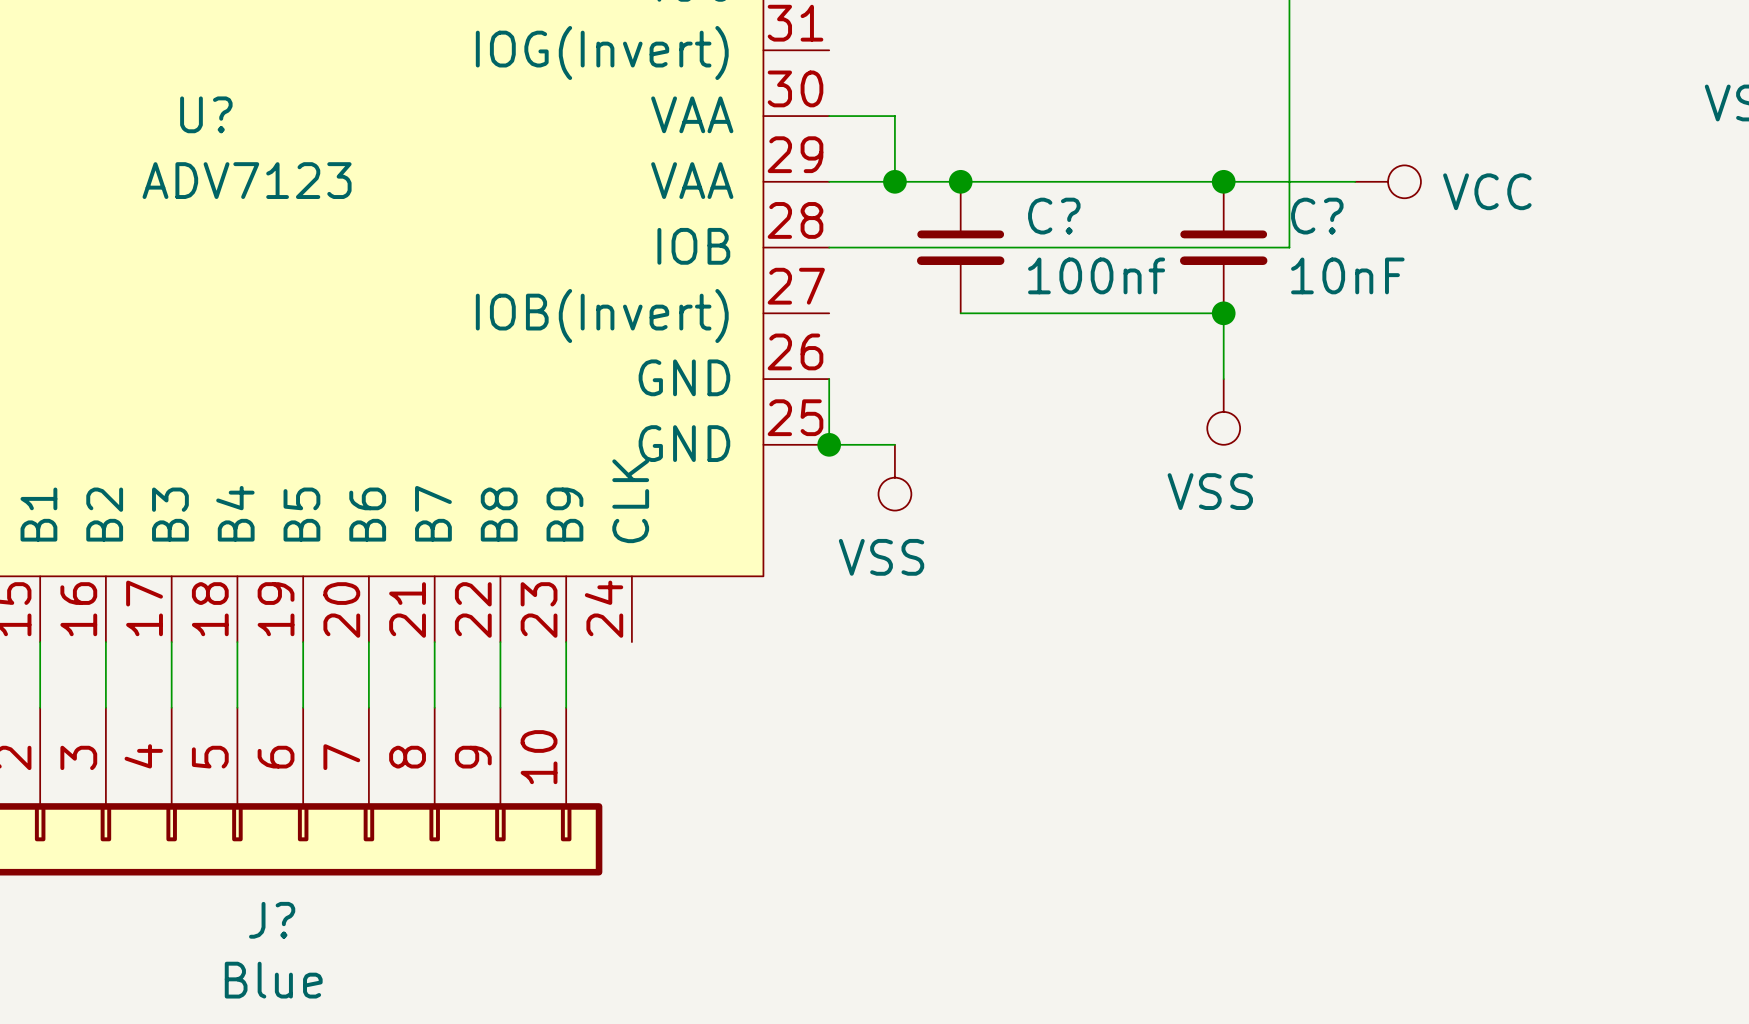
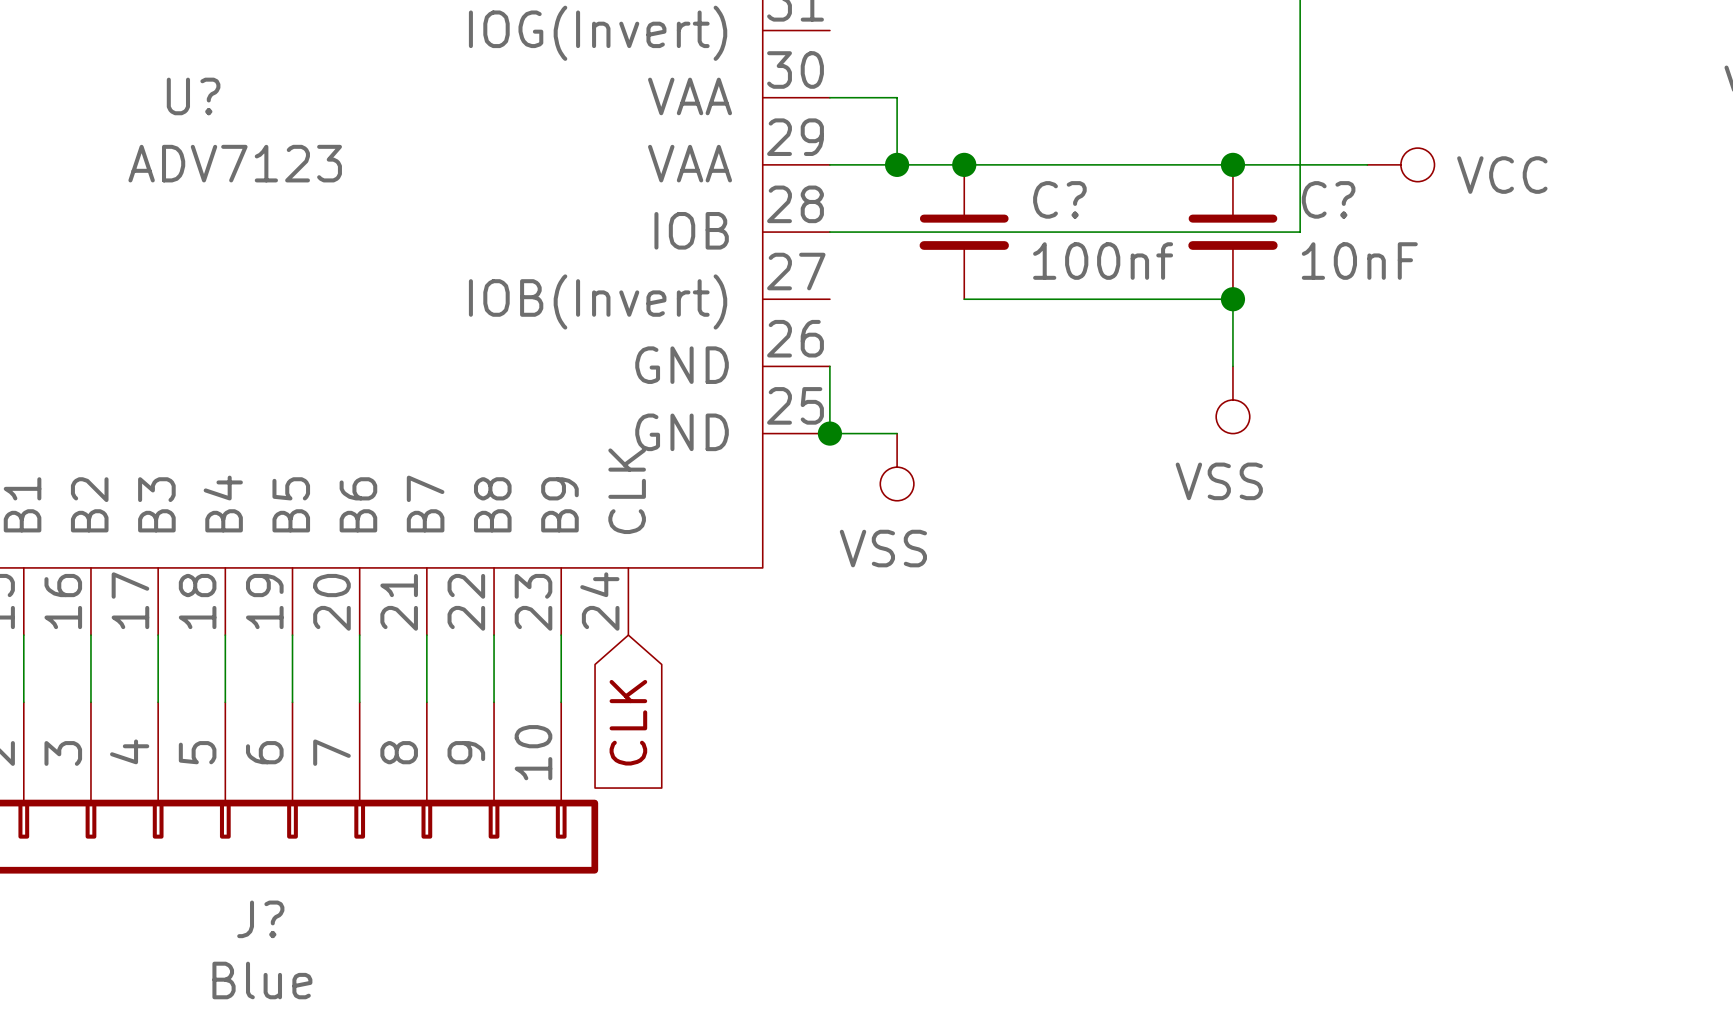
global label: none -> CLK (628, 722)

